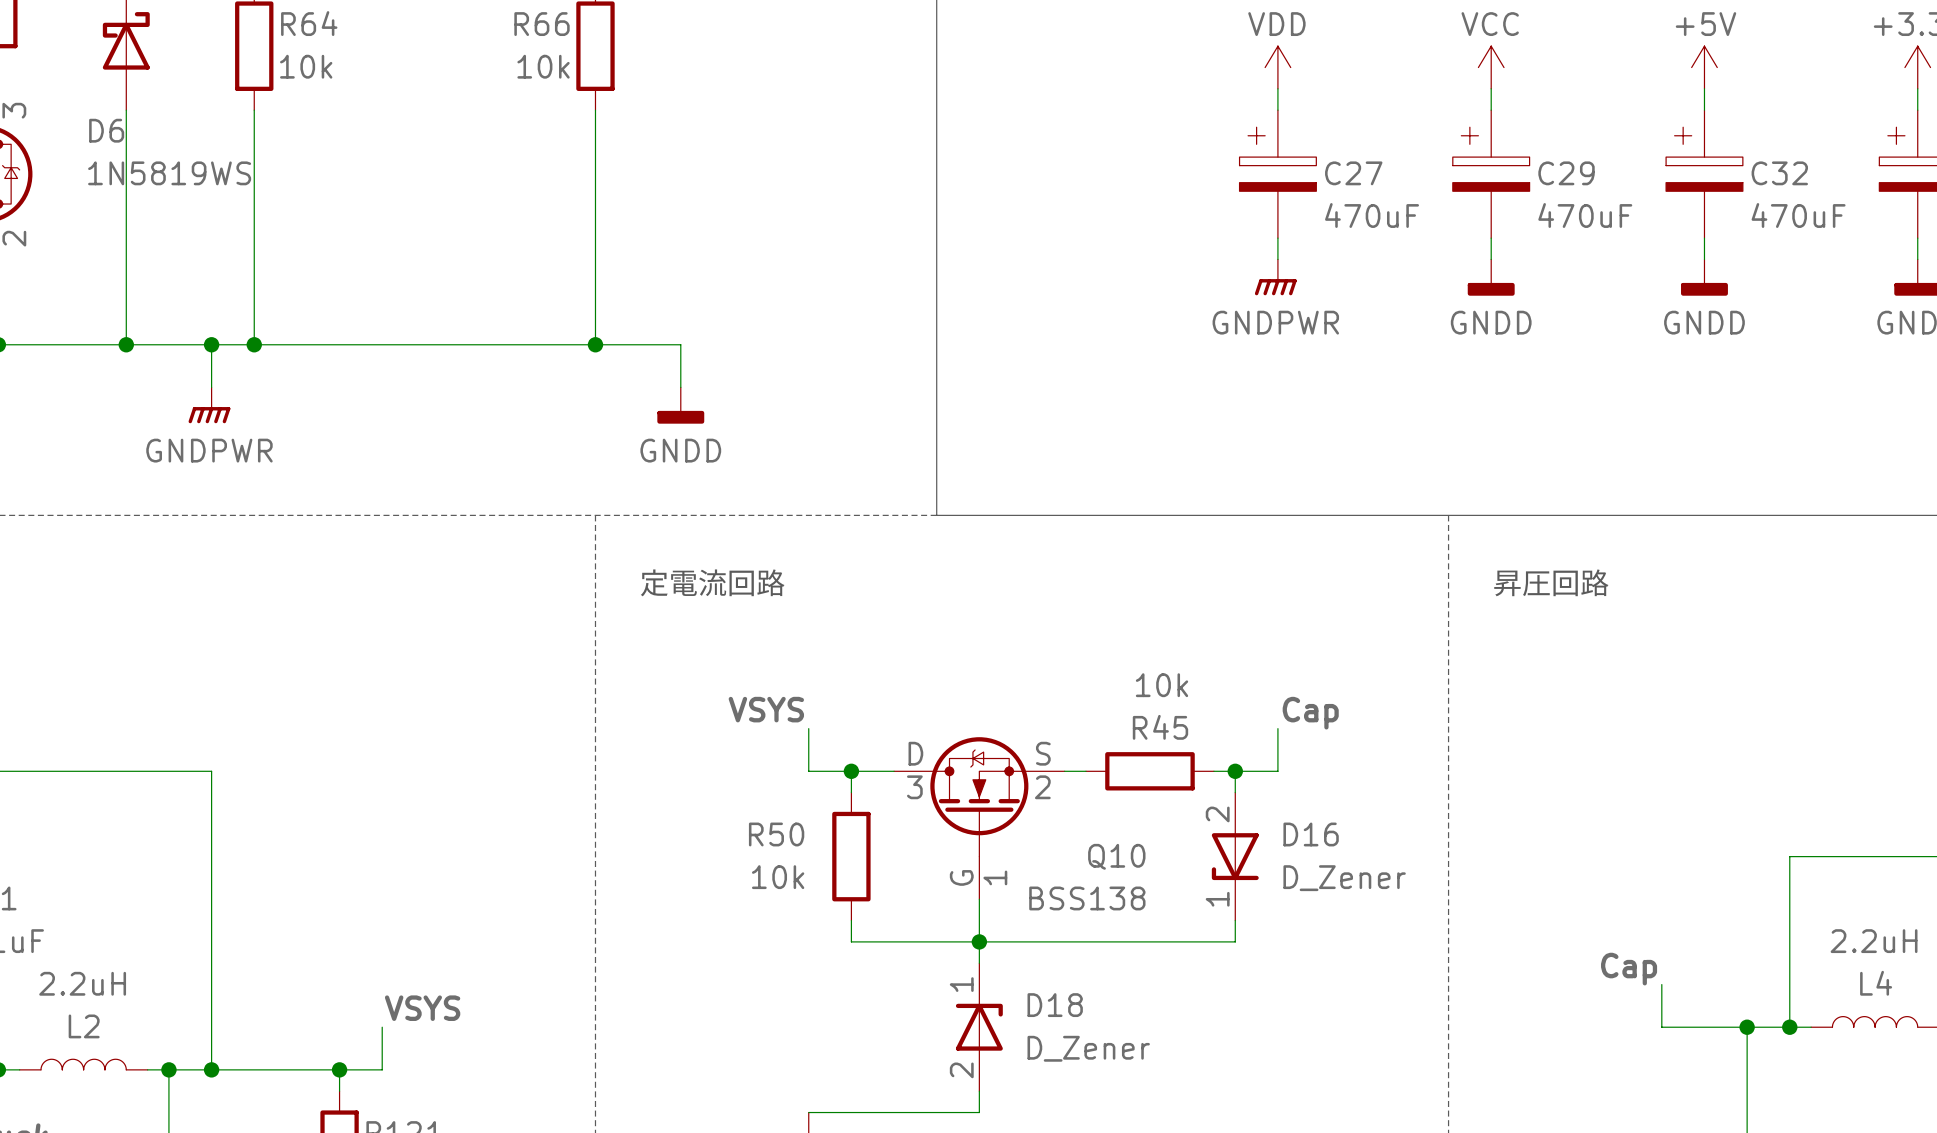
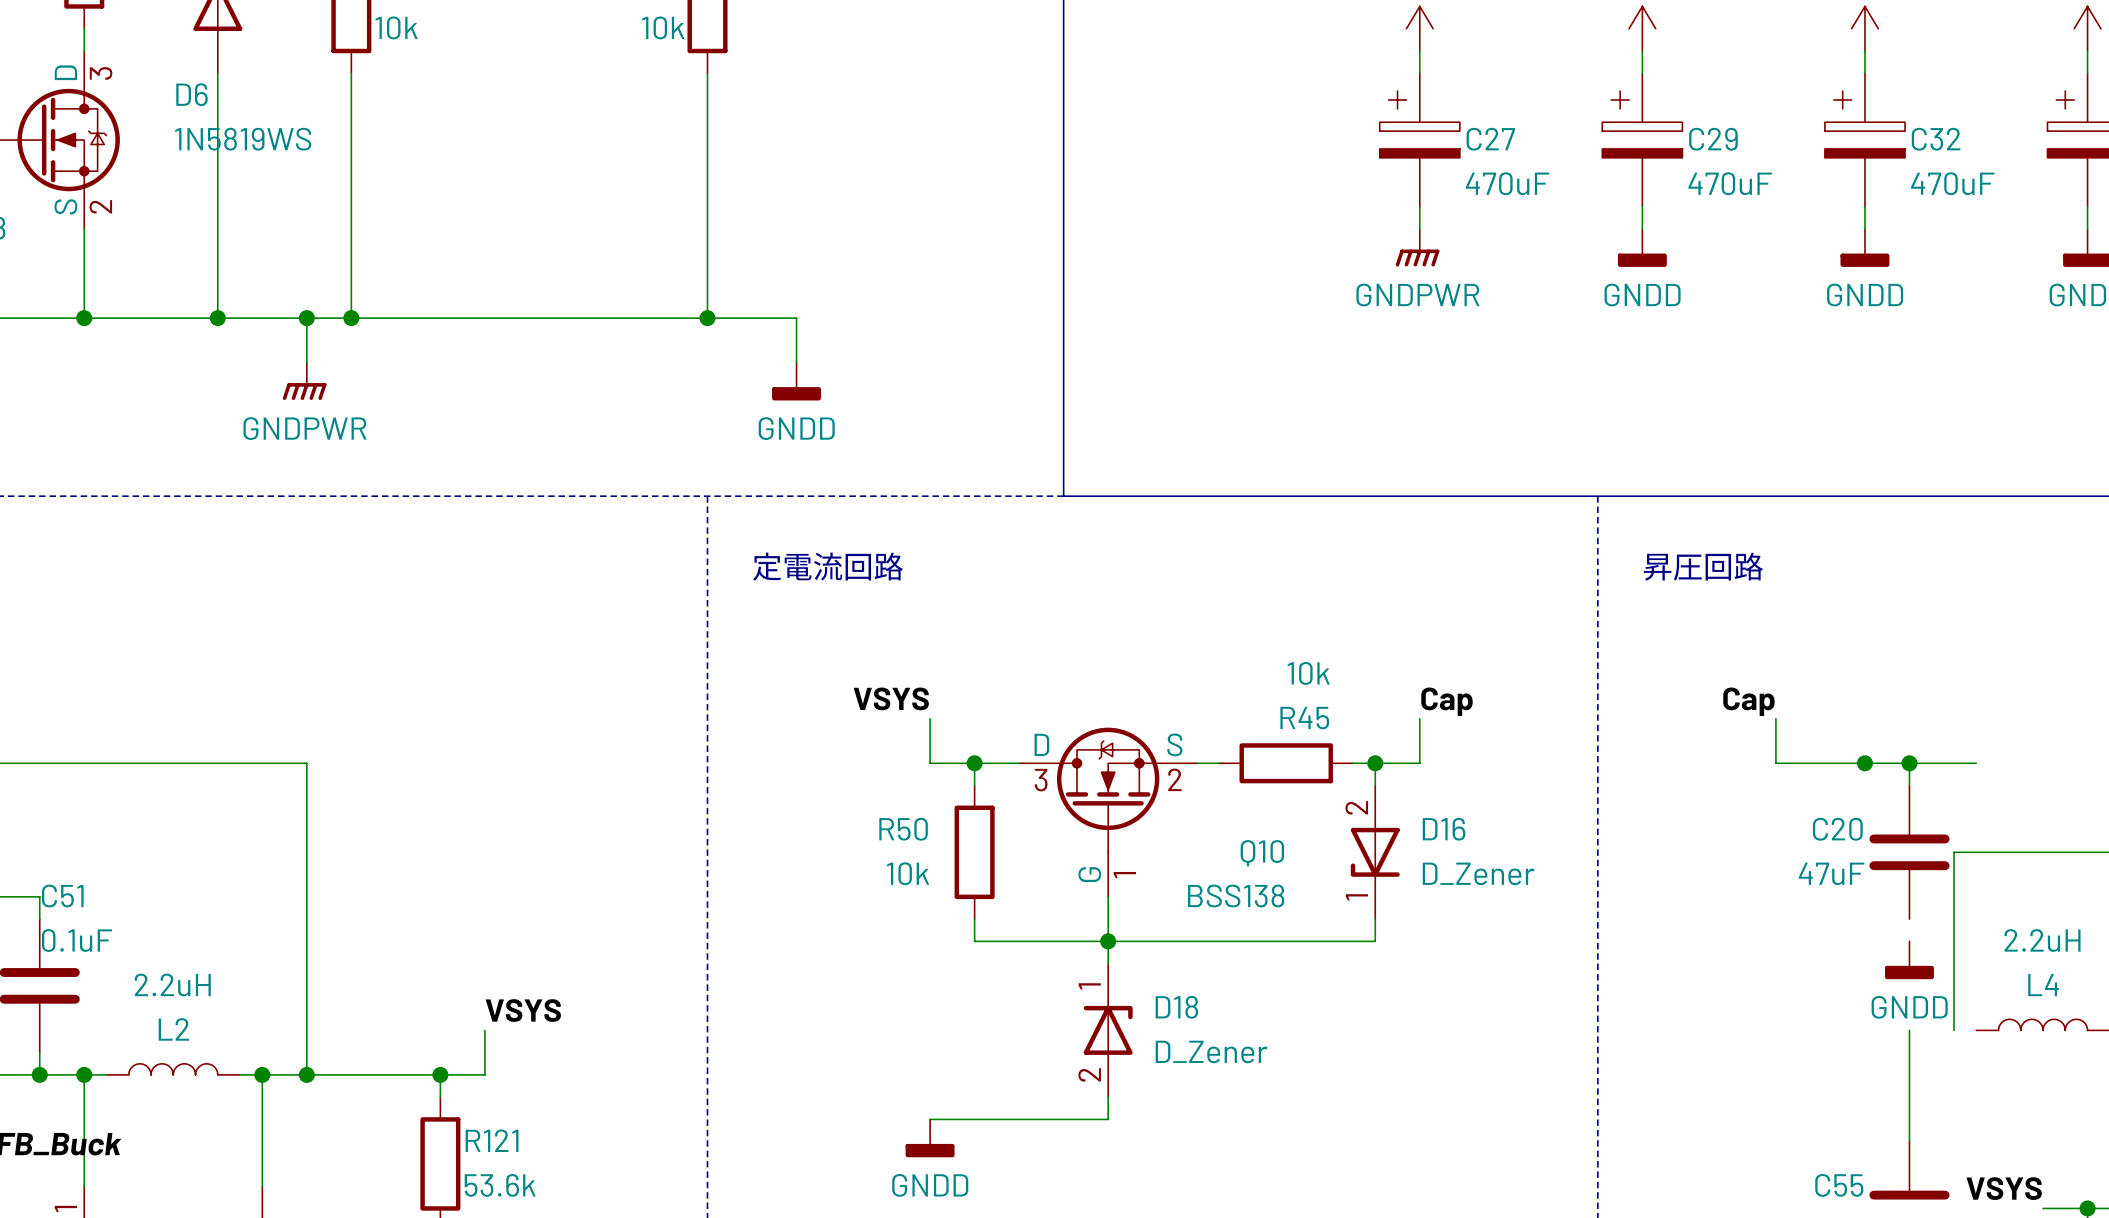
wire: none -> (1775, 718) (1775, 763) (1976, 763)
junction: none -> (1864, 763)
wire: none -> (1909, 763) (1909, 785)
junction: none -> (1909, 763)
C20: none -> 47uF (1909, 852)
power symbol: none -> GNDD (1909, 960)
label position: Cap (1629, 969) -> Cap (1748, 701)
wire: (1661, 984) (1661, 1027) (1811, 1027) -> none
junction: (1747, 1027) -> none
junction: (1789, 1027) -> none

